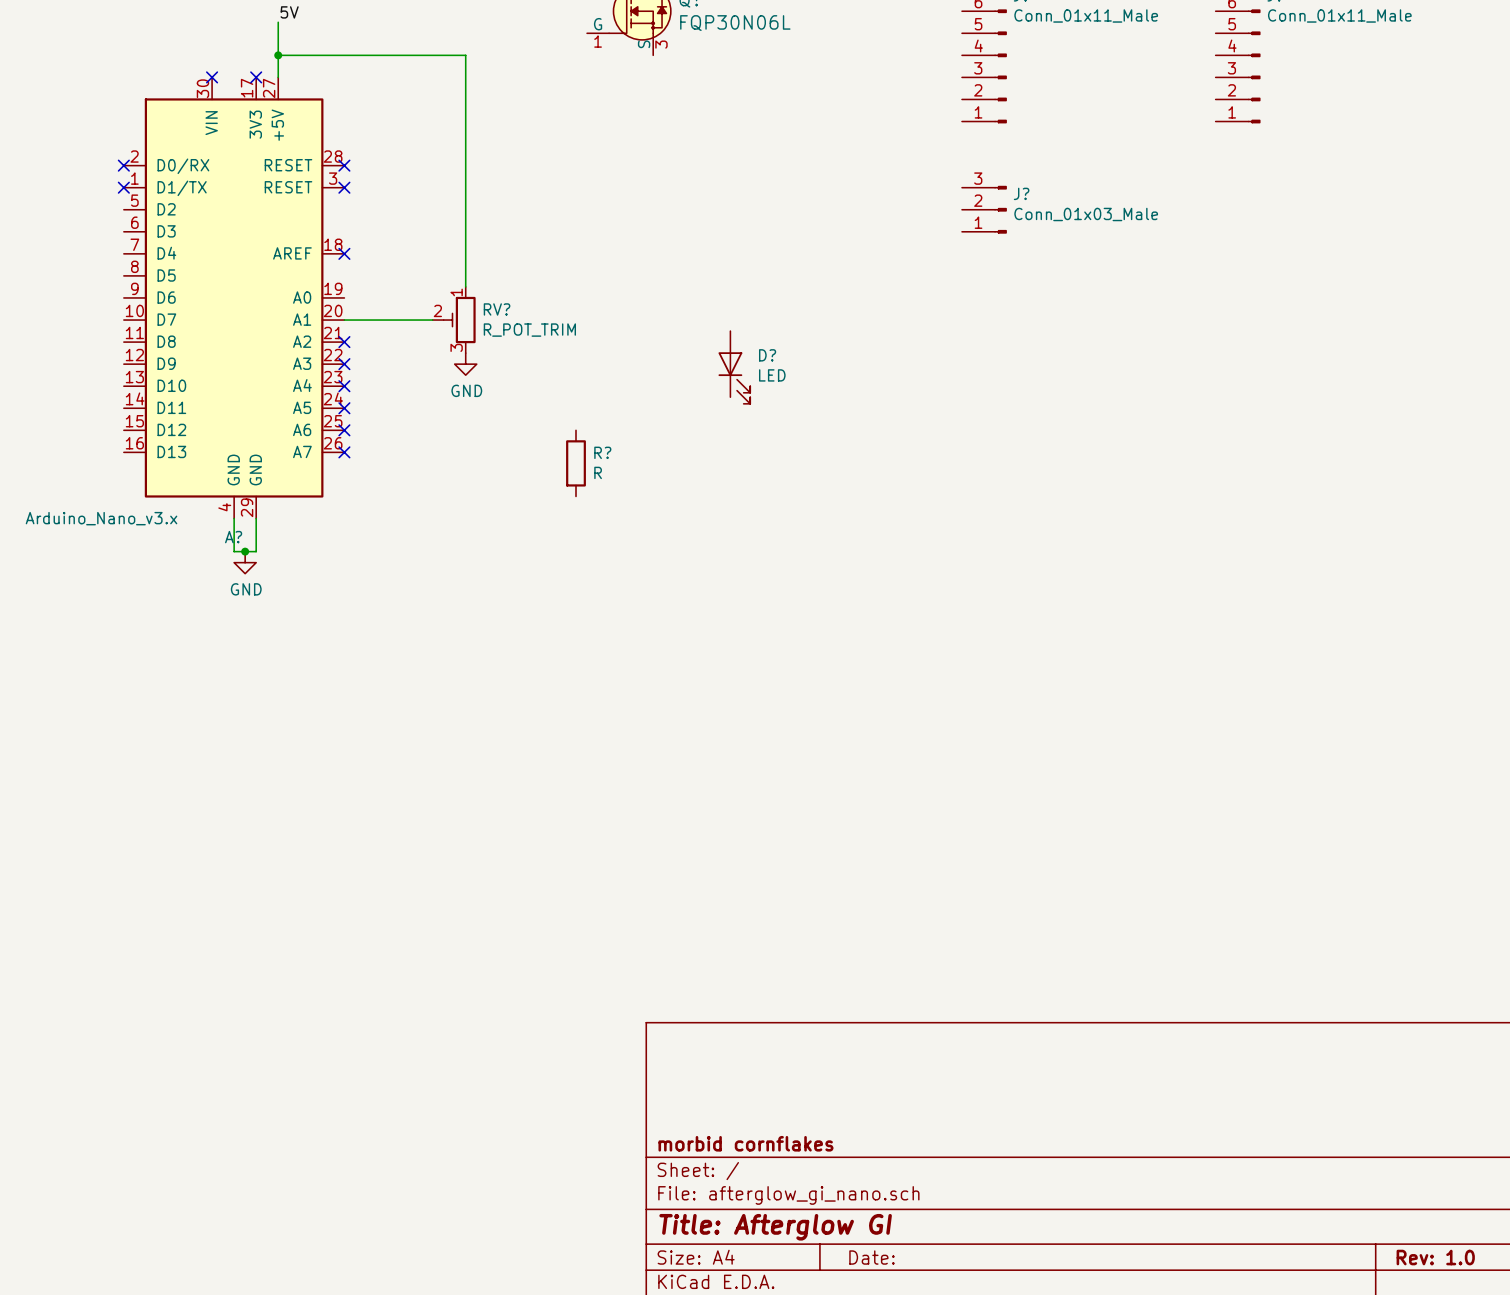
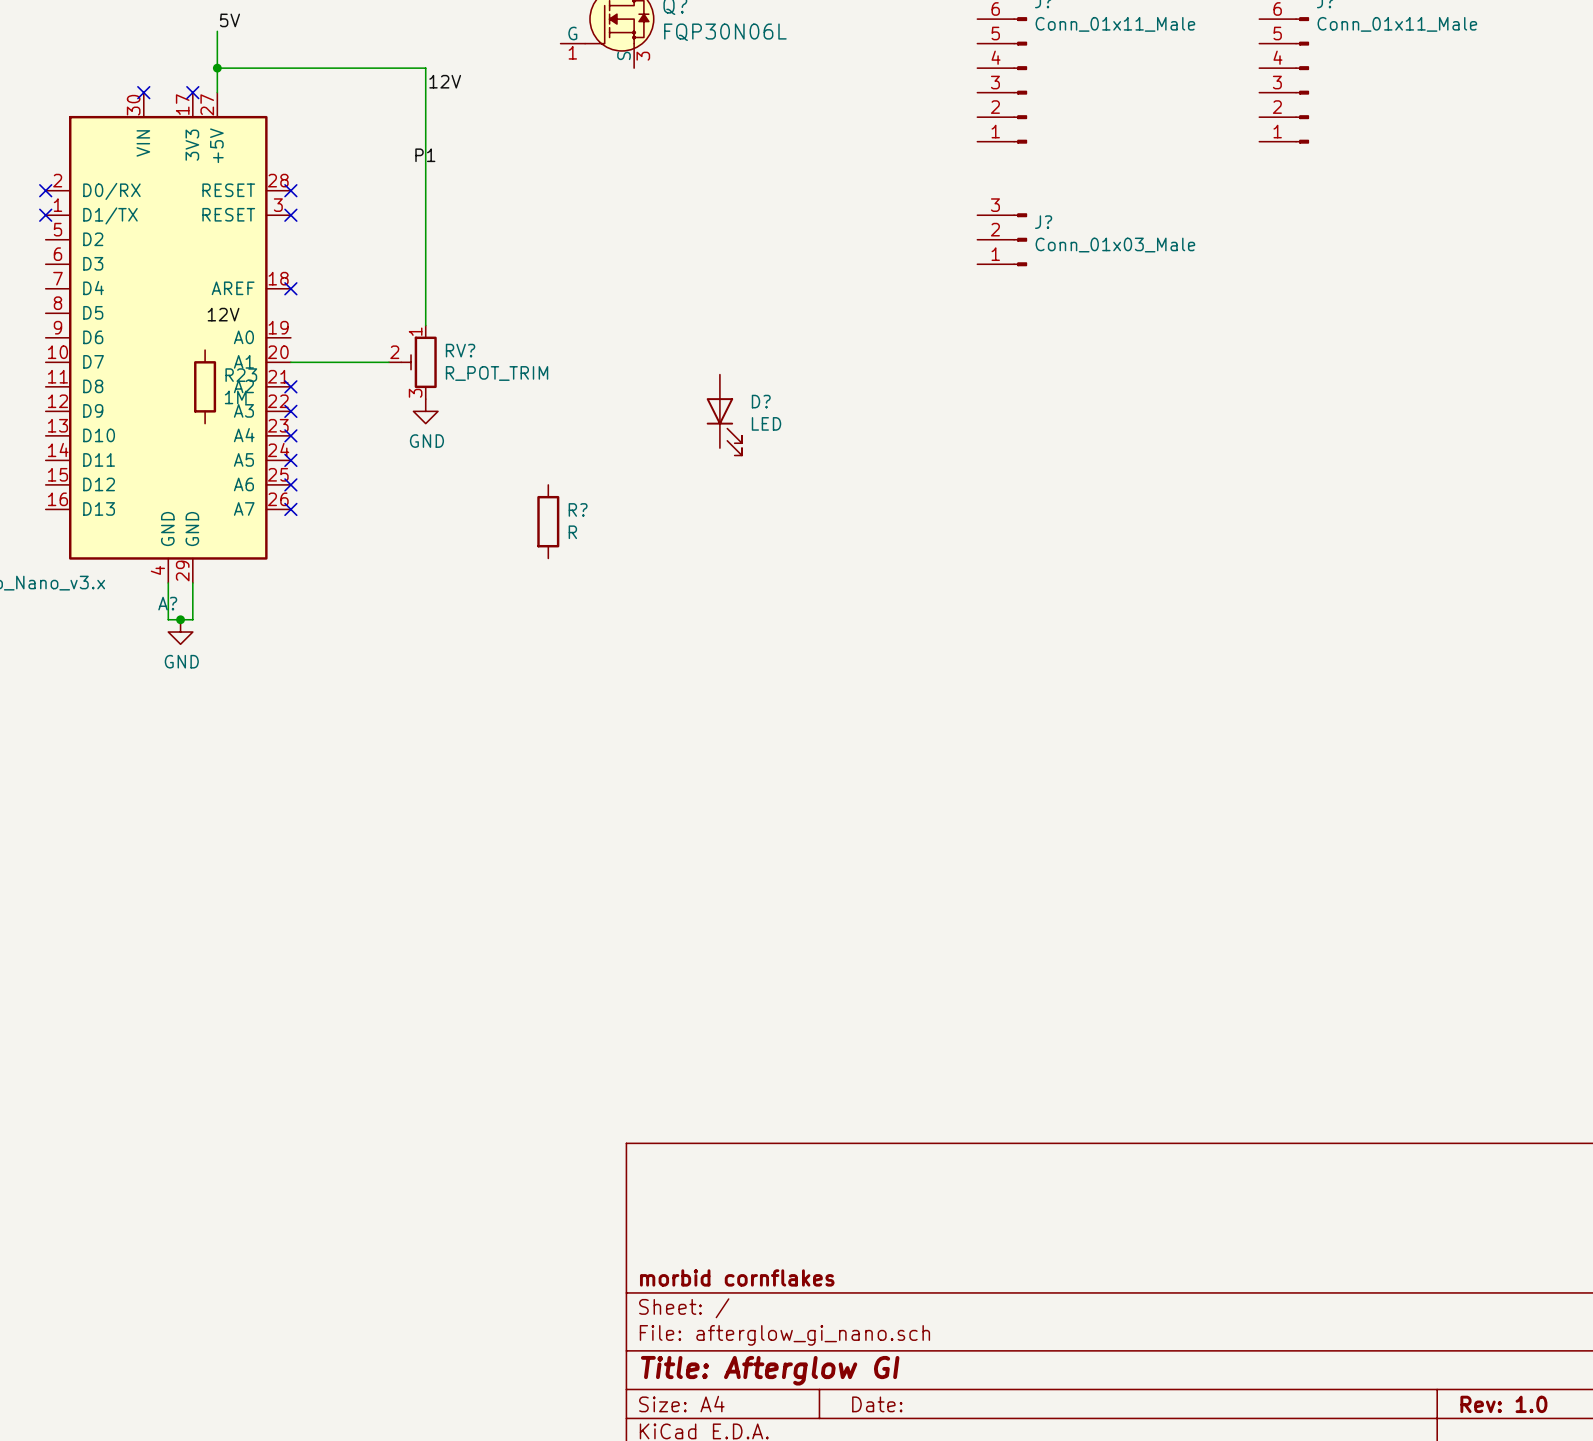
label: none -> 12V (445, 81)
label: none -> P1 (425, 155)
label: none -> 12V (223, 314)
R23: none -> 1M (205, 386)

